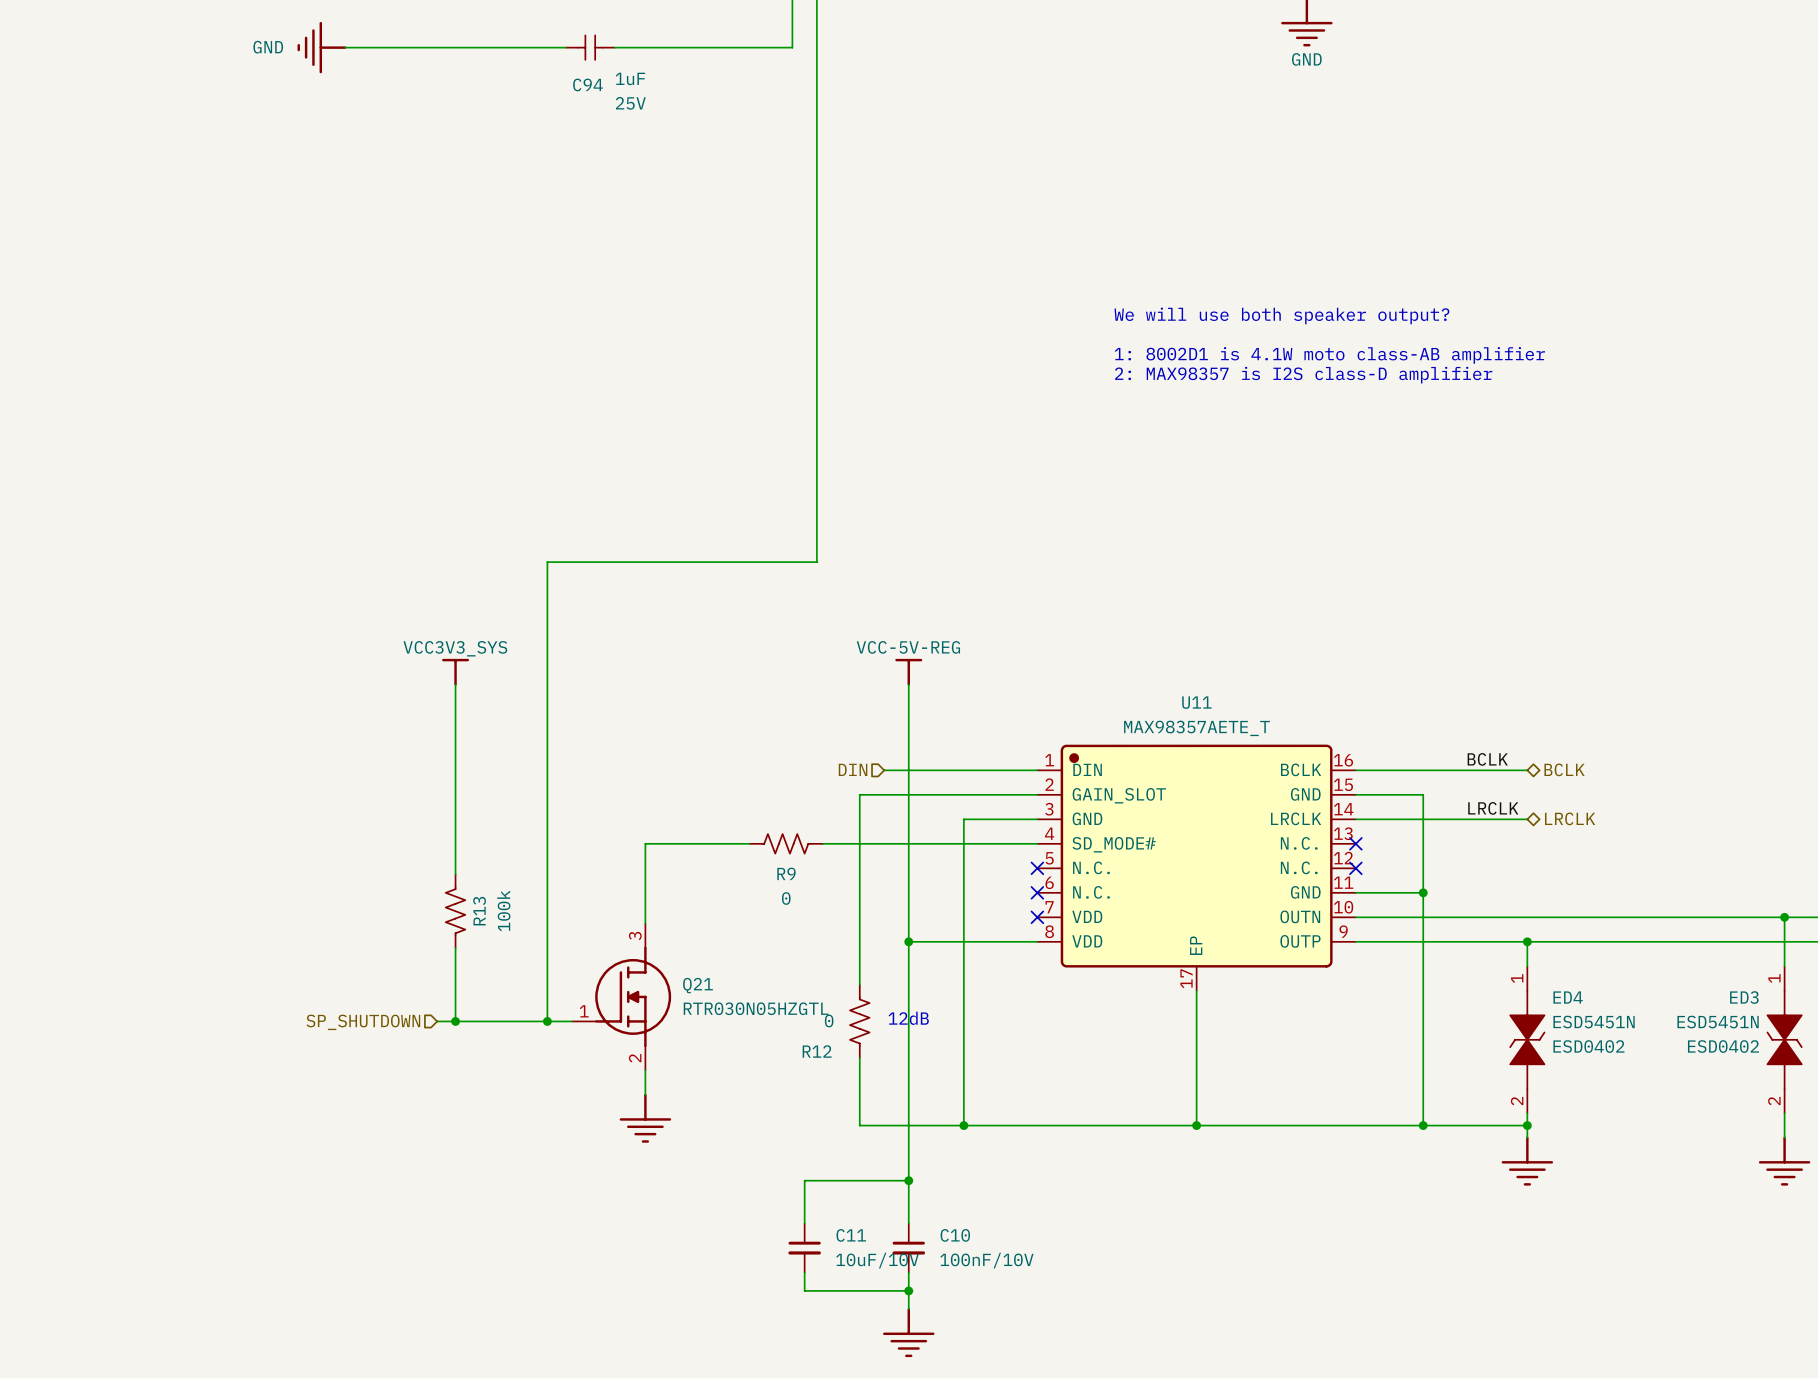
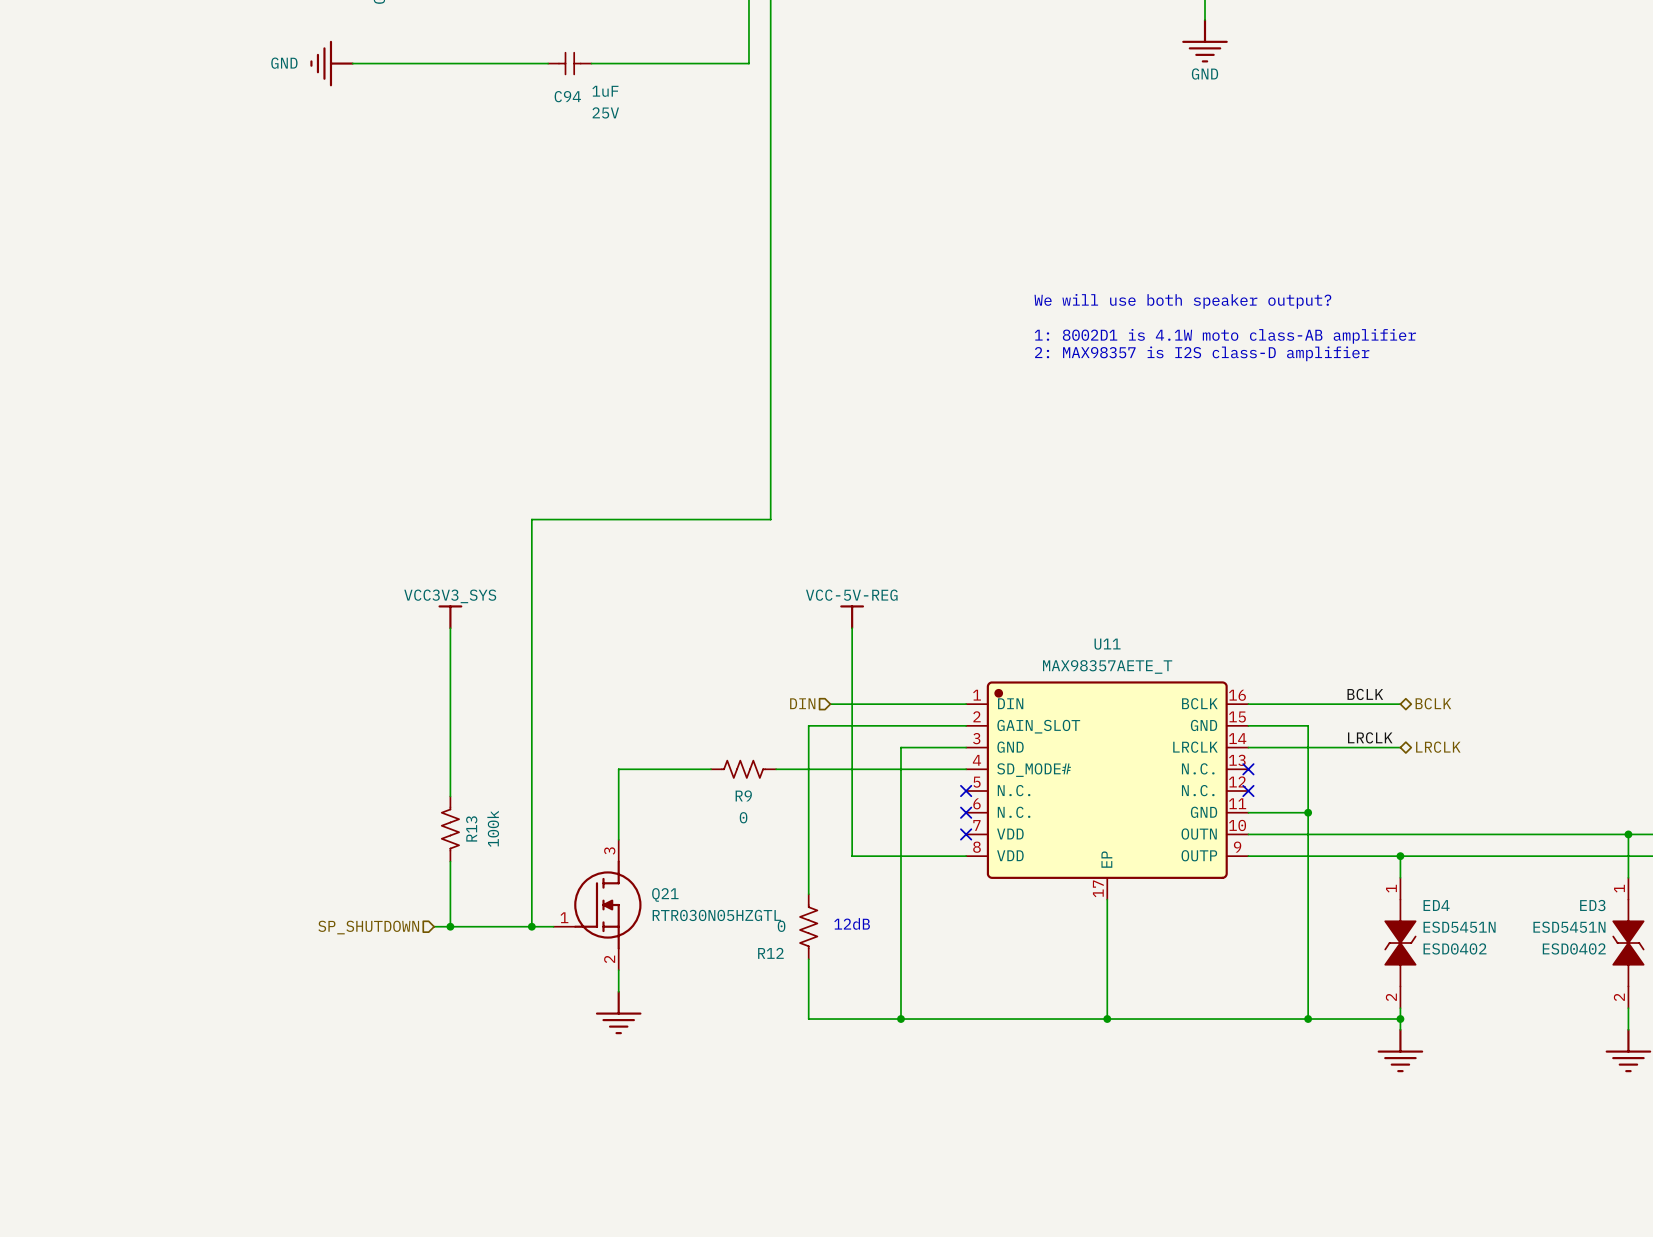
wire: (908, 941) (908, 1223) -> none
junction: (908, 941) -> none
wire: (908, 1180) (804, 1180) (804, 1223) -> none
junction: (908, 1180) -> none
C11: 10uF/10V (804, 1248) -> none
C10: 100nF/10V (908, 1248) -> none
wire: (804, 1272) (804, 1290) (908, 1290) -> none
wire: (908, 1272) (908, 1309) -> none
junction: (908, 1290) -> none
power symbol: (908, 1332) -> none

